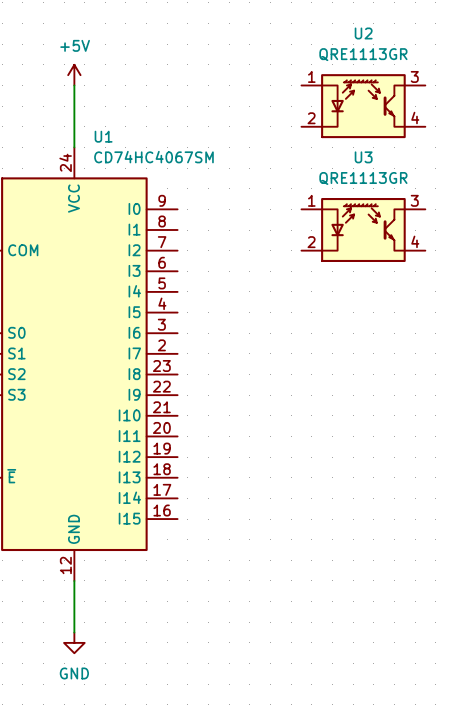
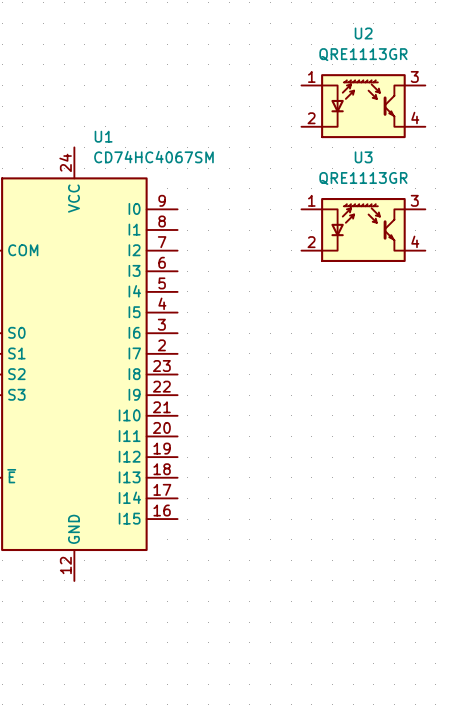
power symbol: +5V (74, 75) -> none
wire: (74, 85) (74, 147) -> none
wire: (74, 580) (74, 632) -> none
power symbol: GND (74, 642) -> none

